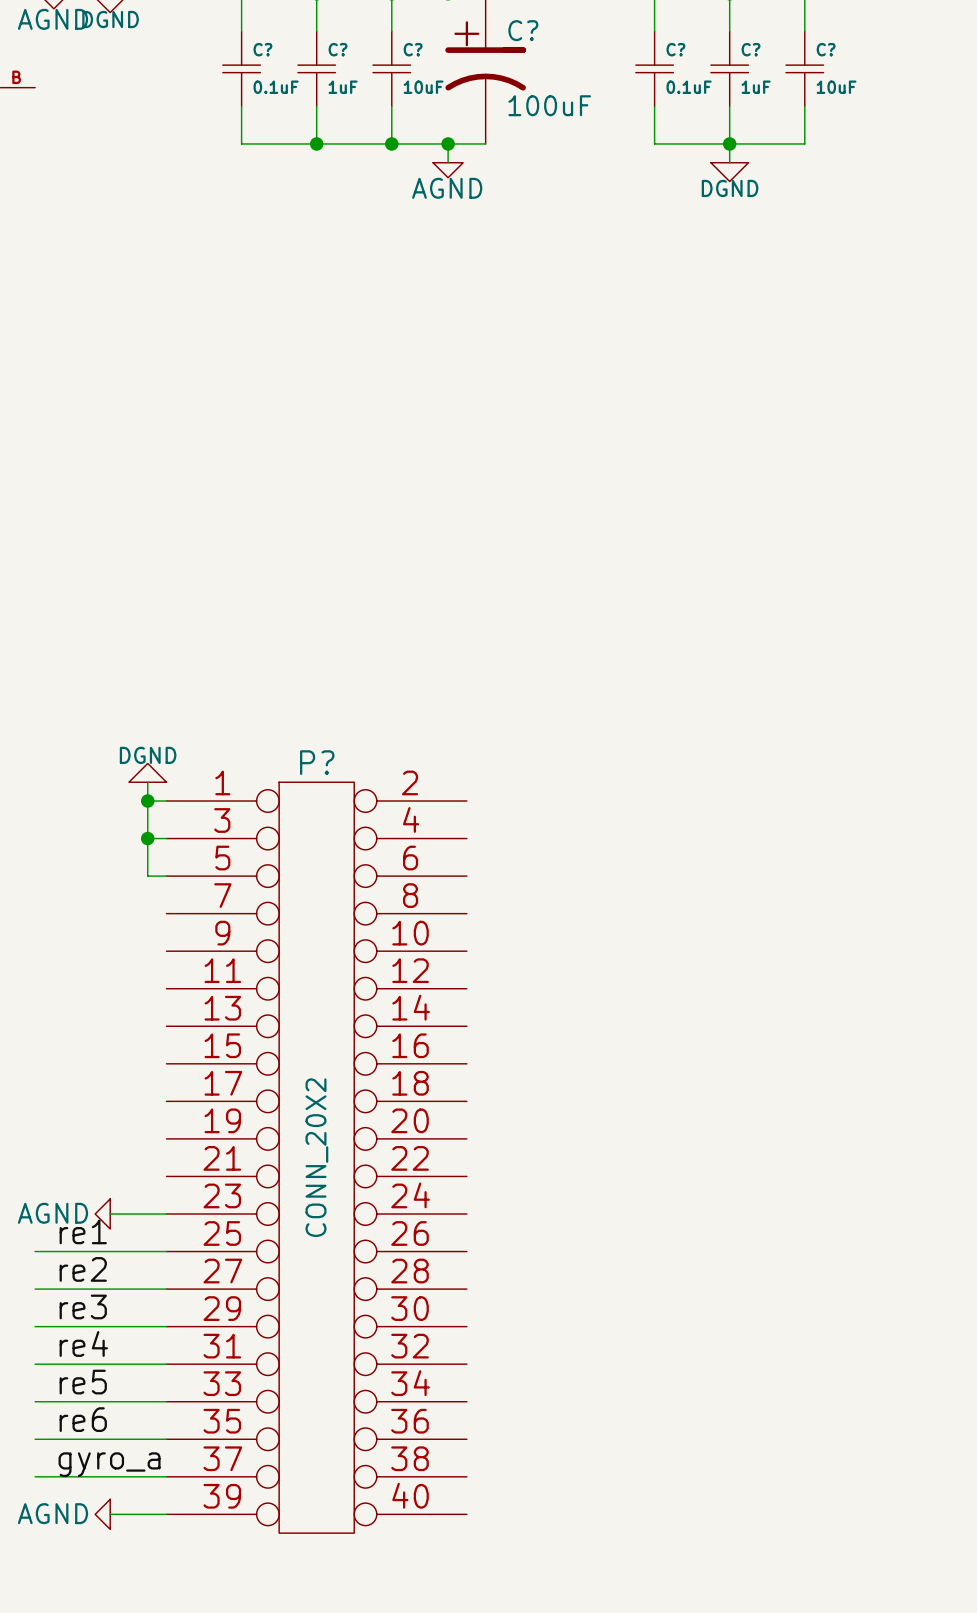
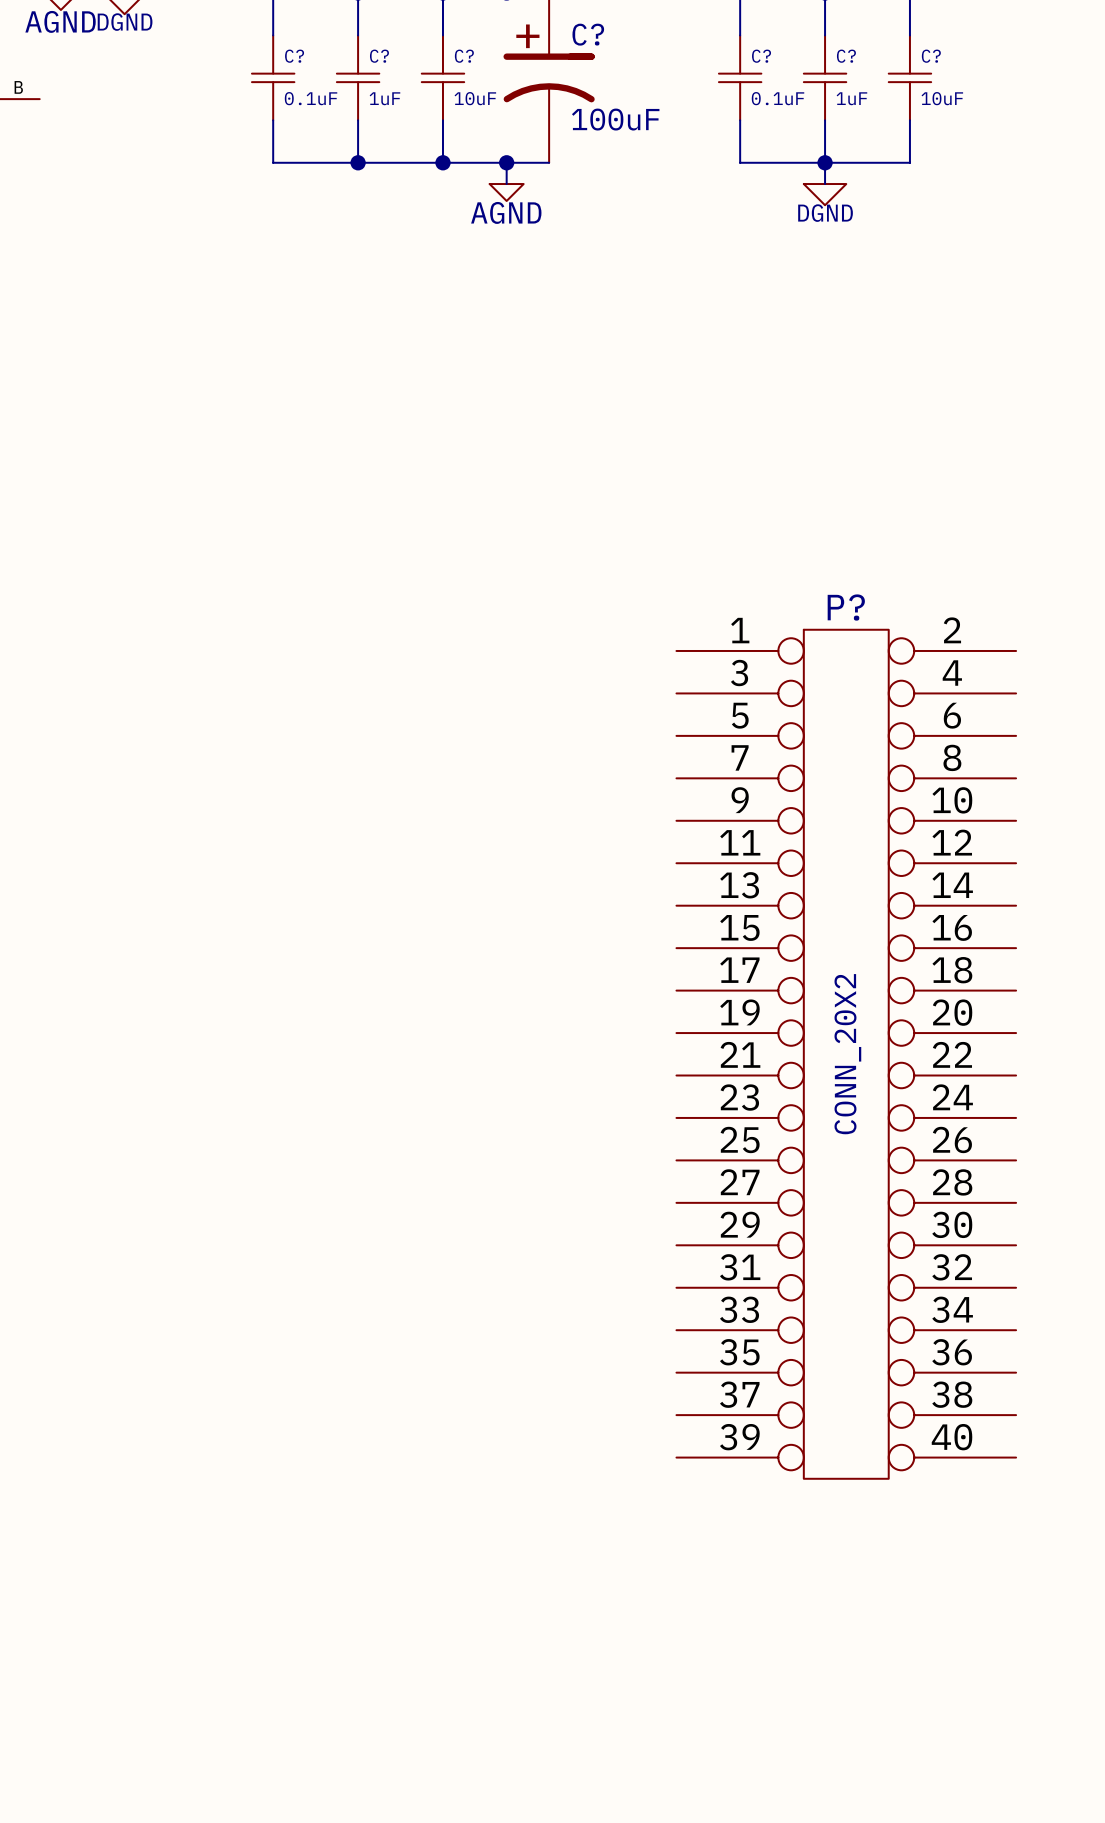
power symbol: DGND (147, 772) -> none
wire: (147, 782) (147, 876) (166, 876) -> none
wire: (147, 801) (166, 801) -> none
junction: (147, 801) -> none
wire: (147, 838) (166, 838) -> none
junction: (147, 838) -> none
P?: none -> CONN_20X2 (846, 1054)
P?: CONN_20X2 (316, 1157) -> none
power symbol: AGND (102, 1214) -> none
wire: (110, 1214) (166, 1214) -> none
label: re1 (83, 1231) -> none
wire: (35, 1251) (166, 1251) -> none
label: re2 (83, 1269) -> none
wire: (35, 1289) (166, 1289) -> none
label: re3 (83, 1306) -> none
wire: (35, 1326) (166, 1326) -> none
label: re4 (83, 1343) -> none
wire: (35, 1364) (166, 1364) -> none
label: re5 (83, 1382) -> none
wire: (35, 1401) (166, 1401) -> none
label: re6 (83, 1419) -> none
wire: (35, 1439) (166, 1439) -> none
label: gyro_a (109, 1464) -> none
wire: (35, 1476) (166, 1476) -> none
power symbol: AGND (102, 1514) -> none
wire: (110, 1514) (166, 1514) -> none

